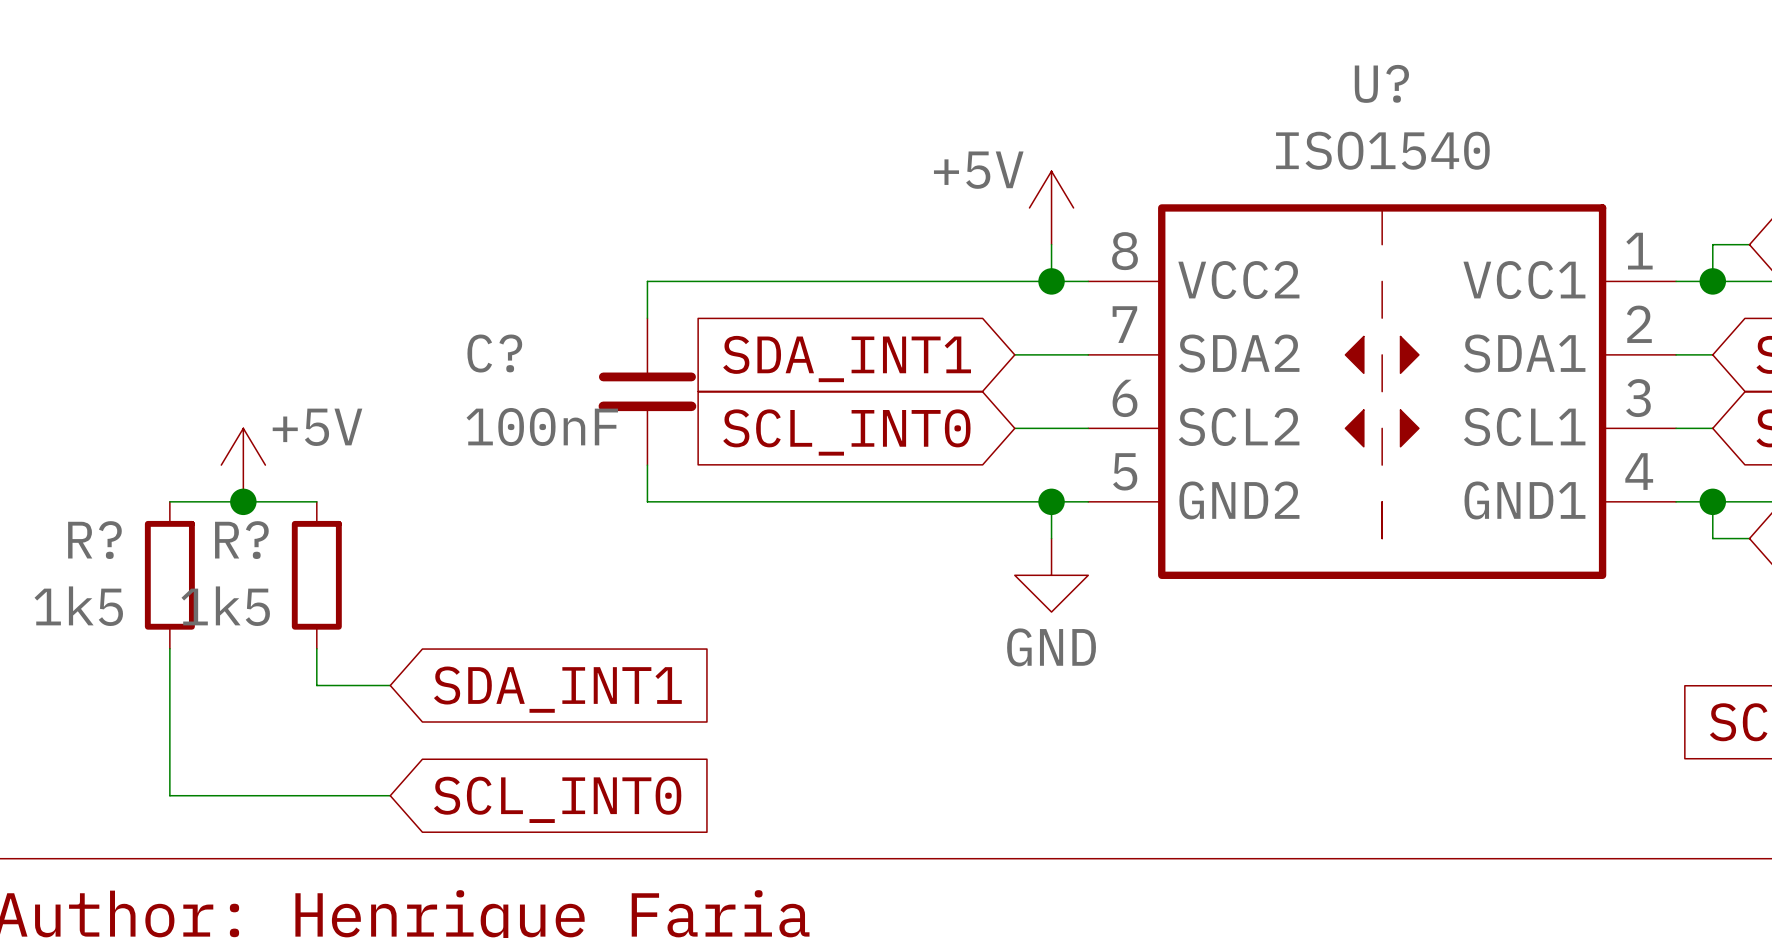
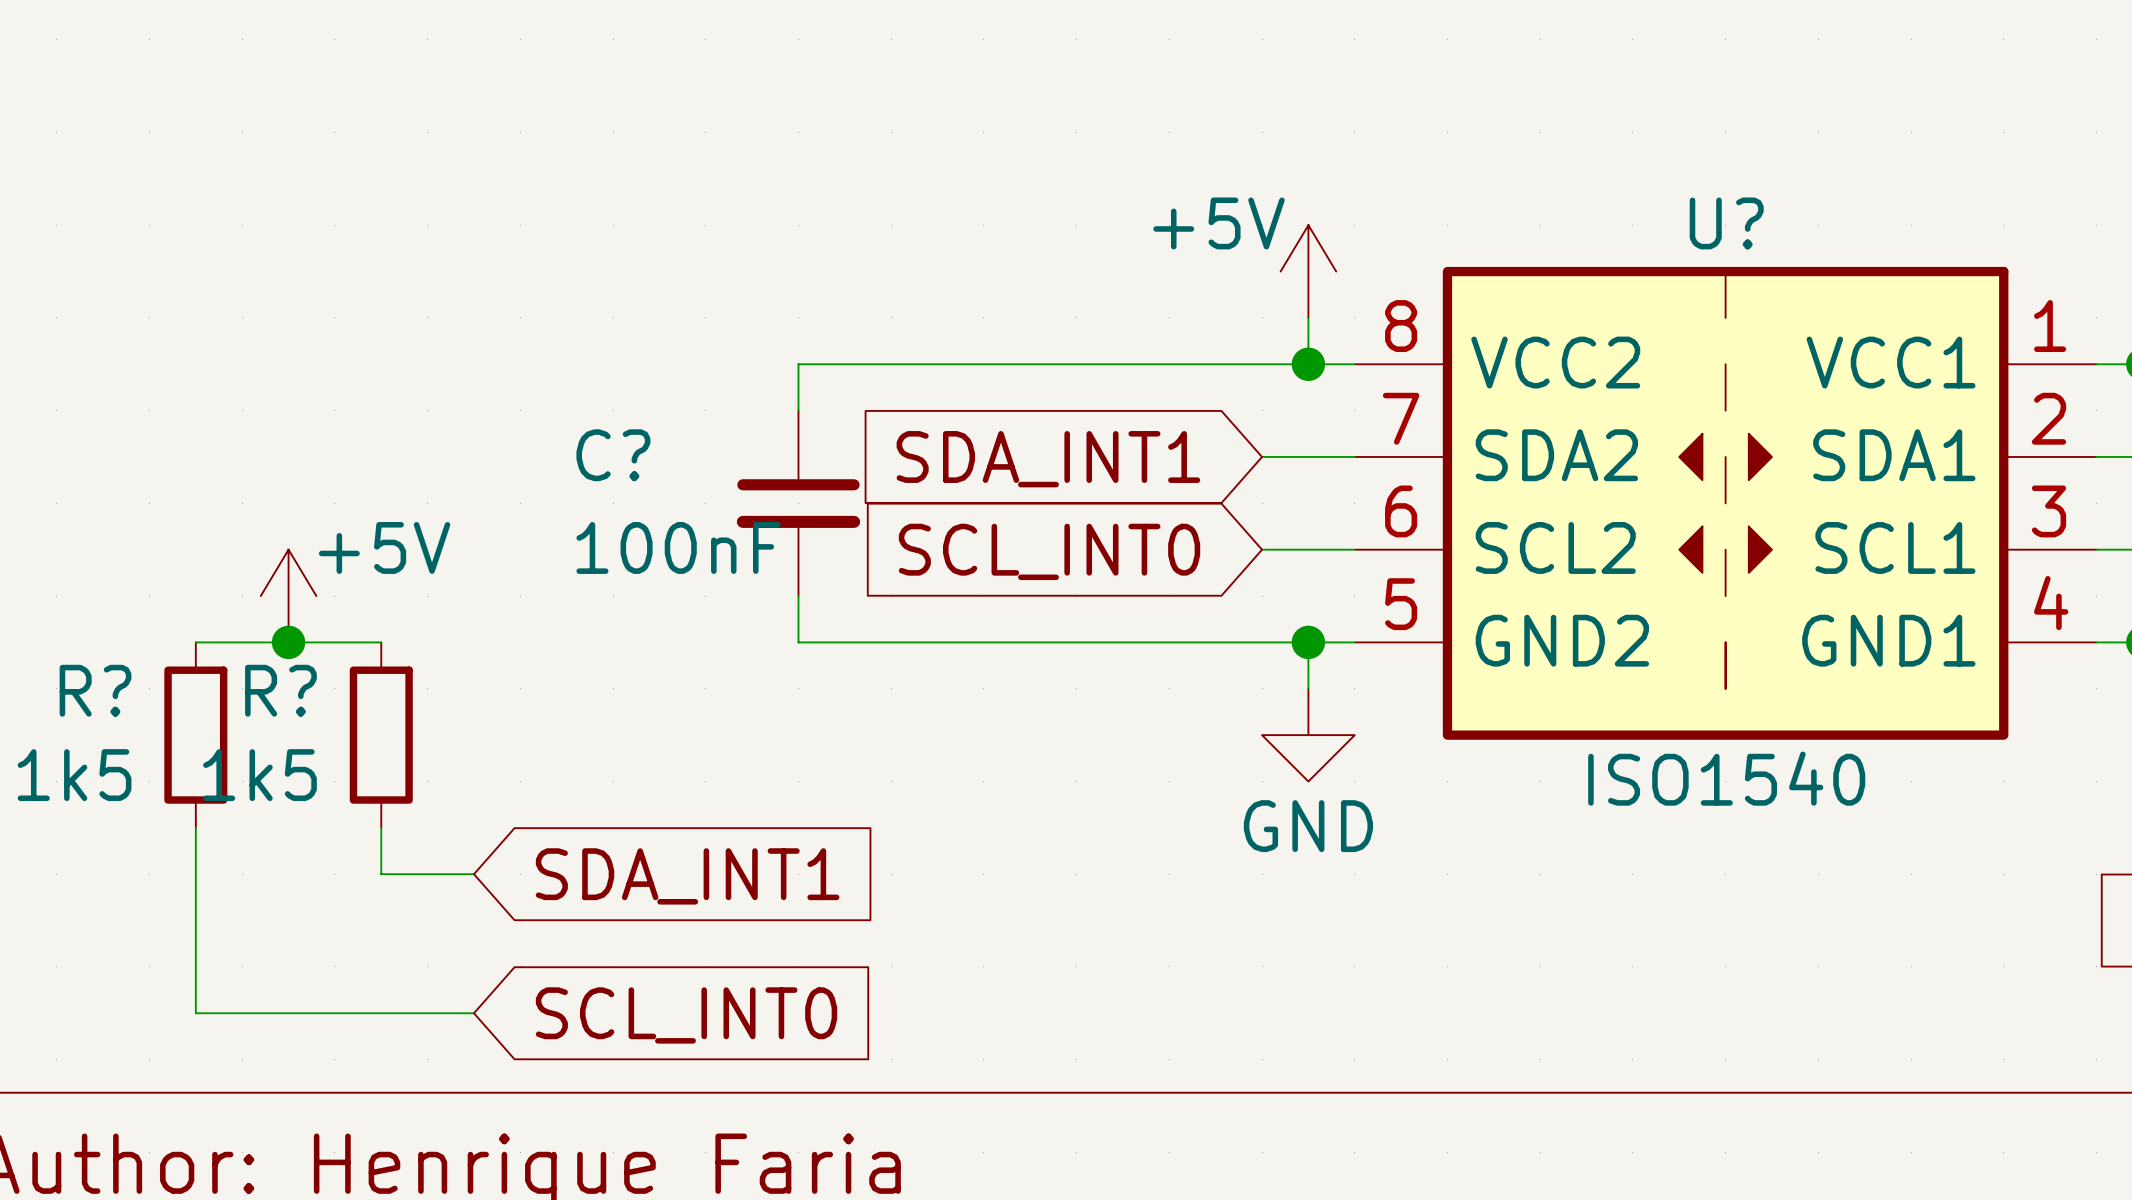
U? name position: U? (1381, 83) -> U? (1726, 223)
U? value position: ISO1540 (1382, 150) -> ISO1540 (1726, 778)

